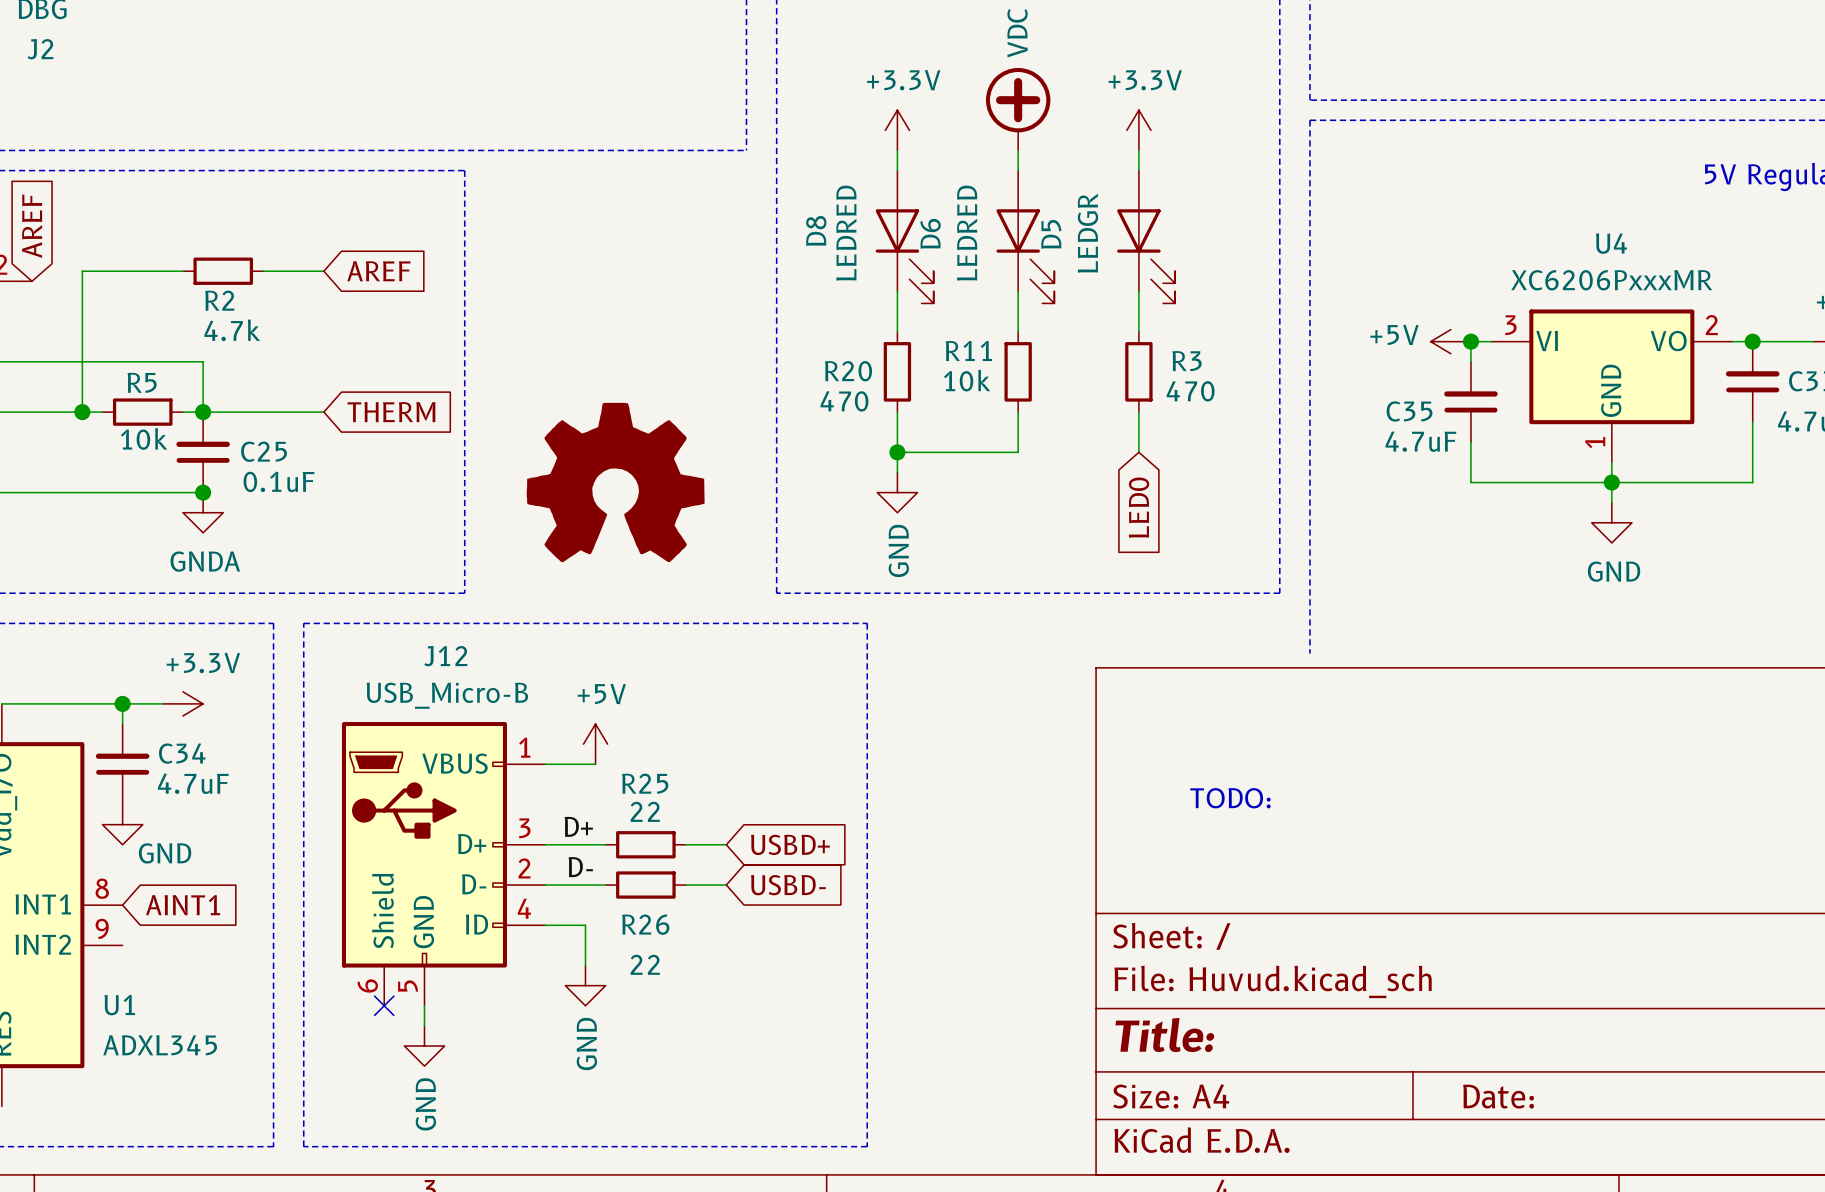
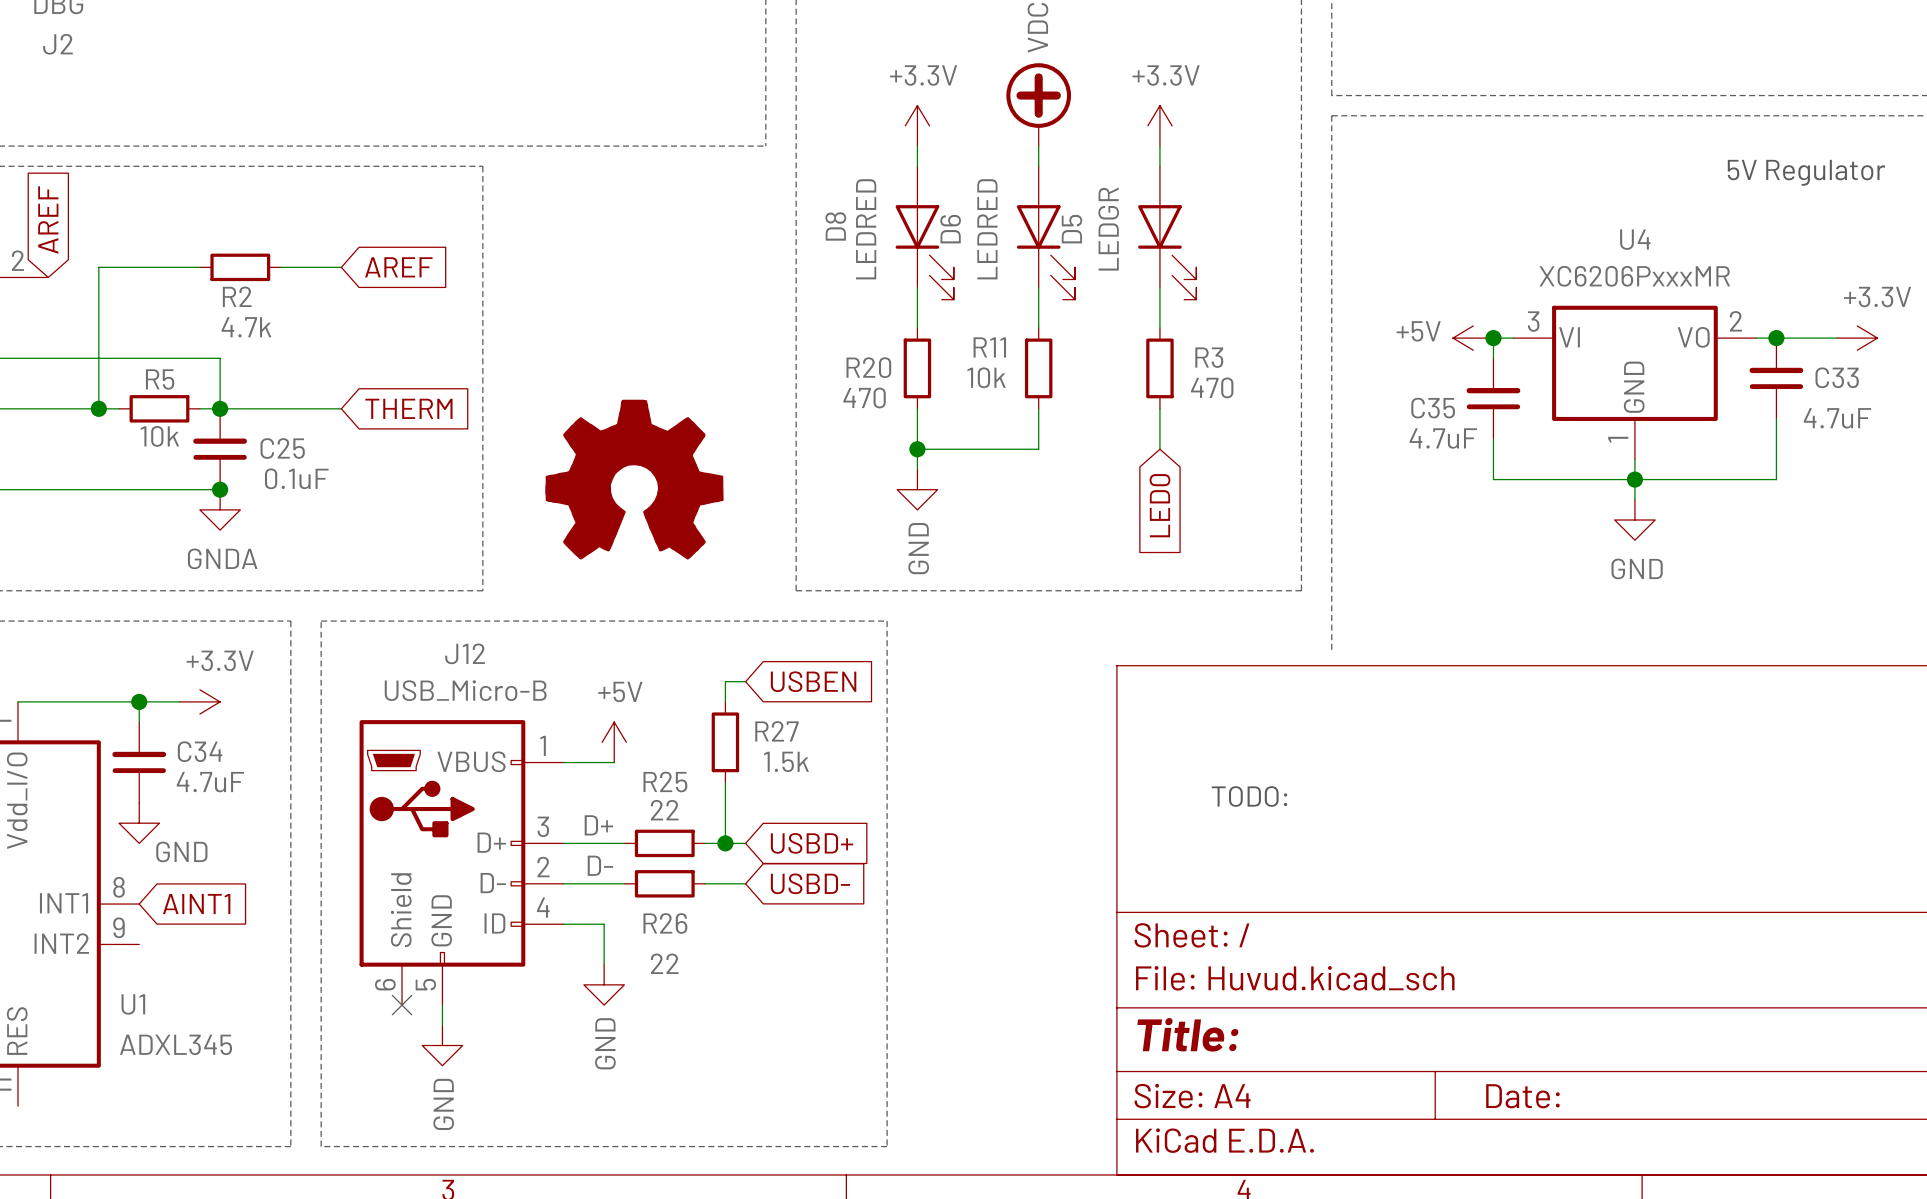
wire: none -> (745, 681) (725, 681) (725, 701)
global label: none -> USBEN (813, 681)
R27: none -> 1.5k (725, 742)
wire: none -> (725, 782) (725, 843)
junction: none -> (725, 843)

